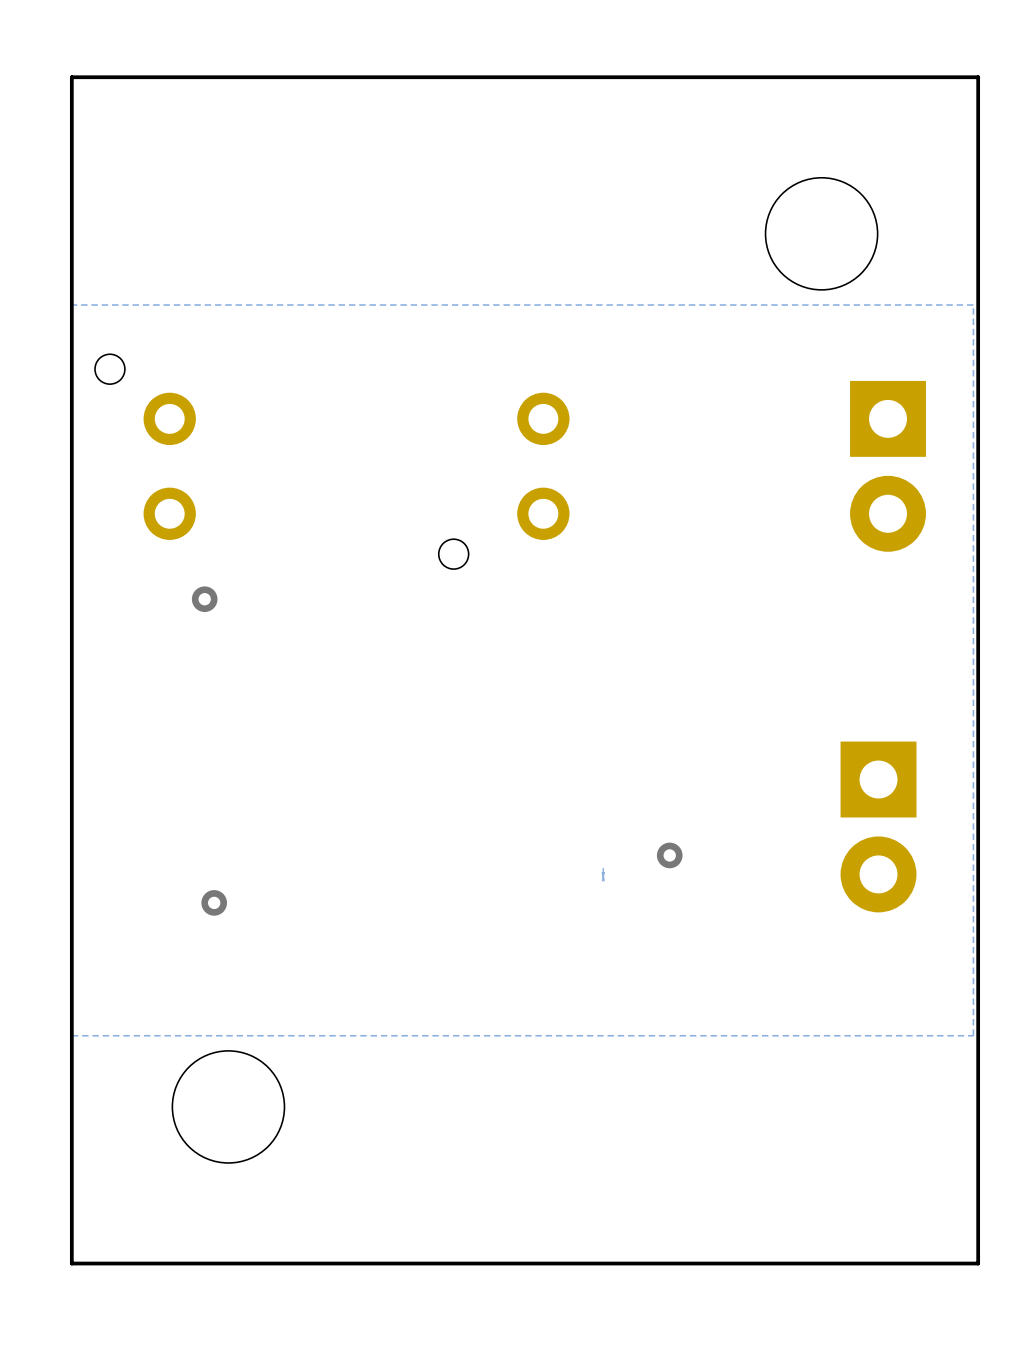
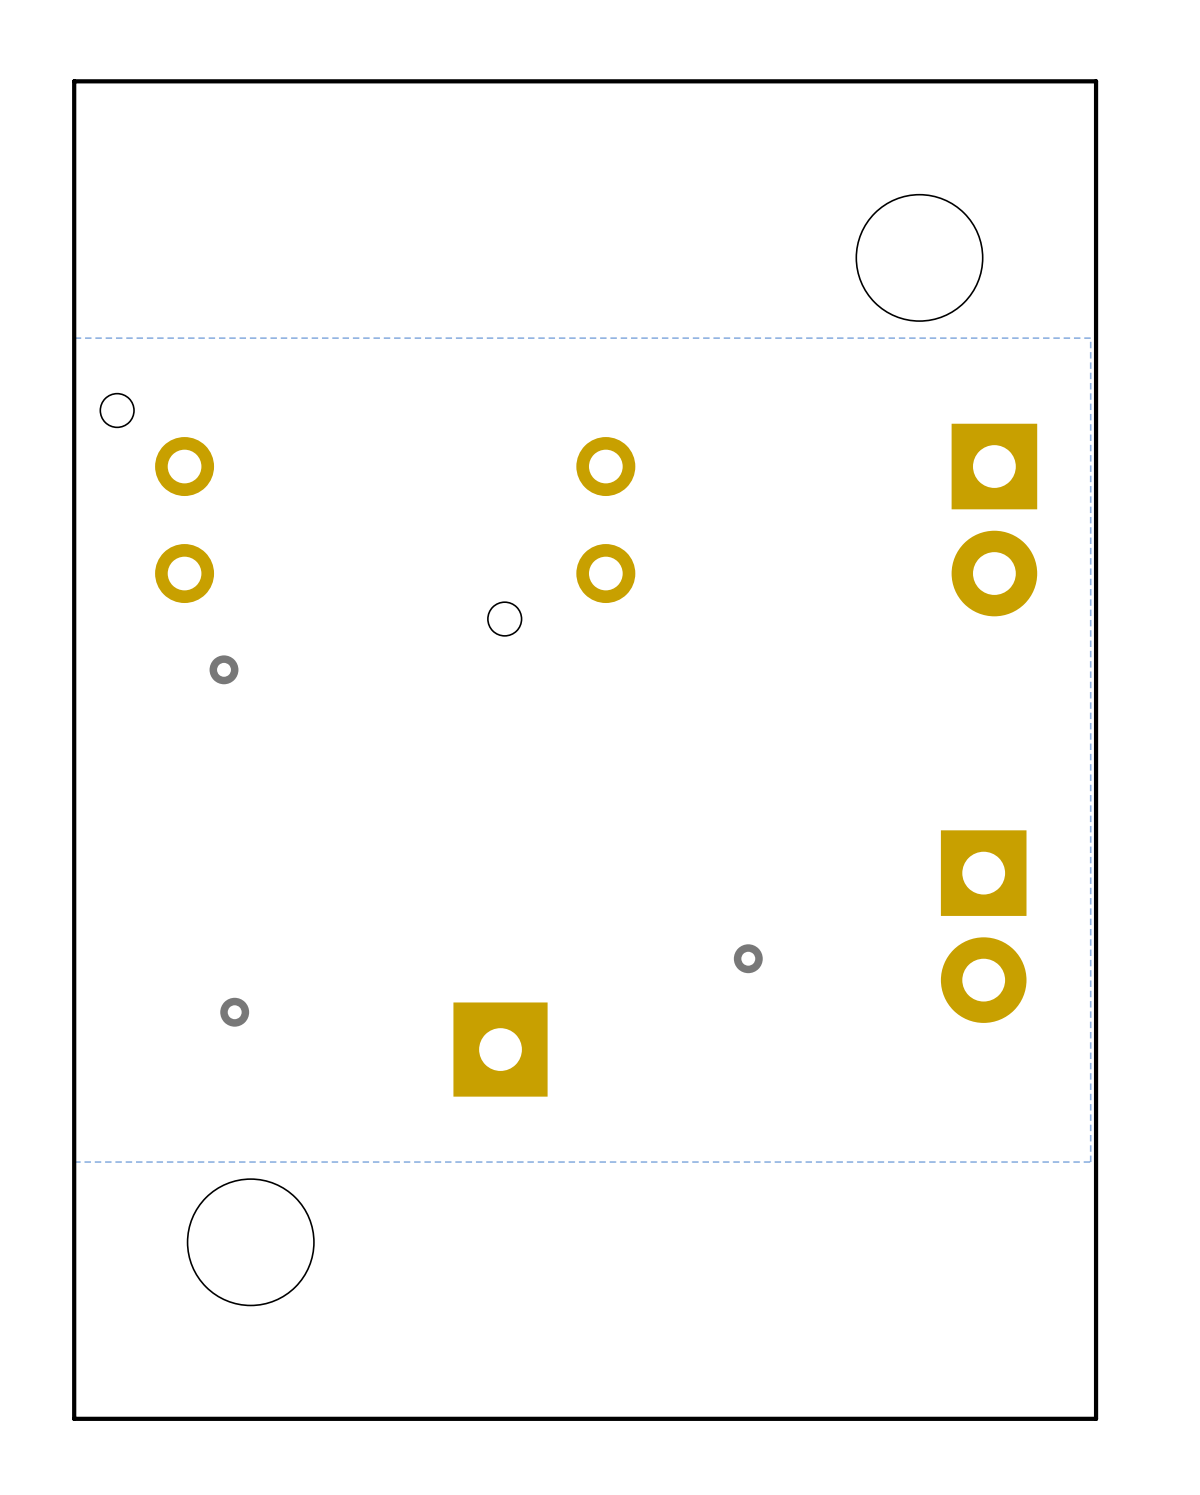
text: * (603, 874) -> none
part: none -> (500, 1049)

